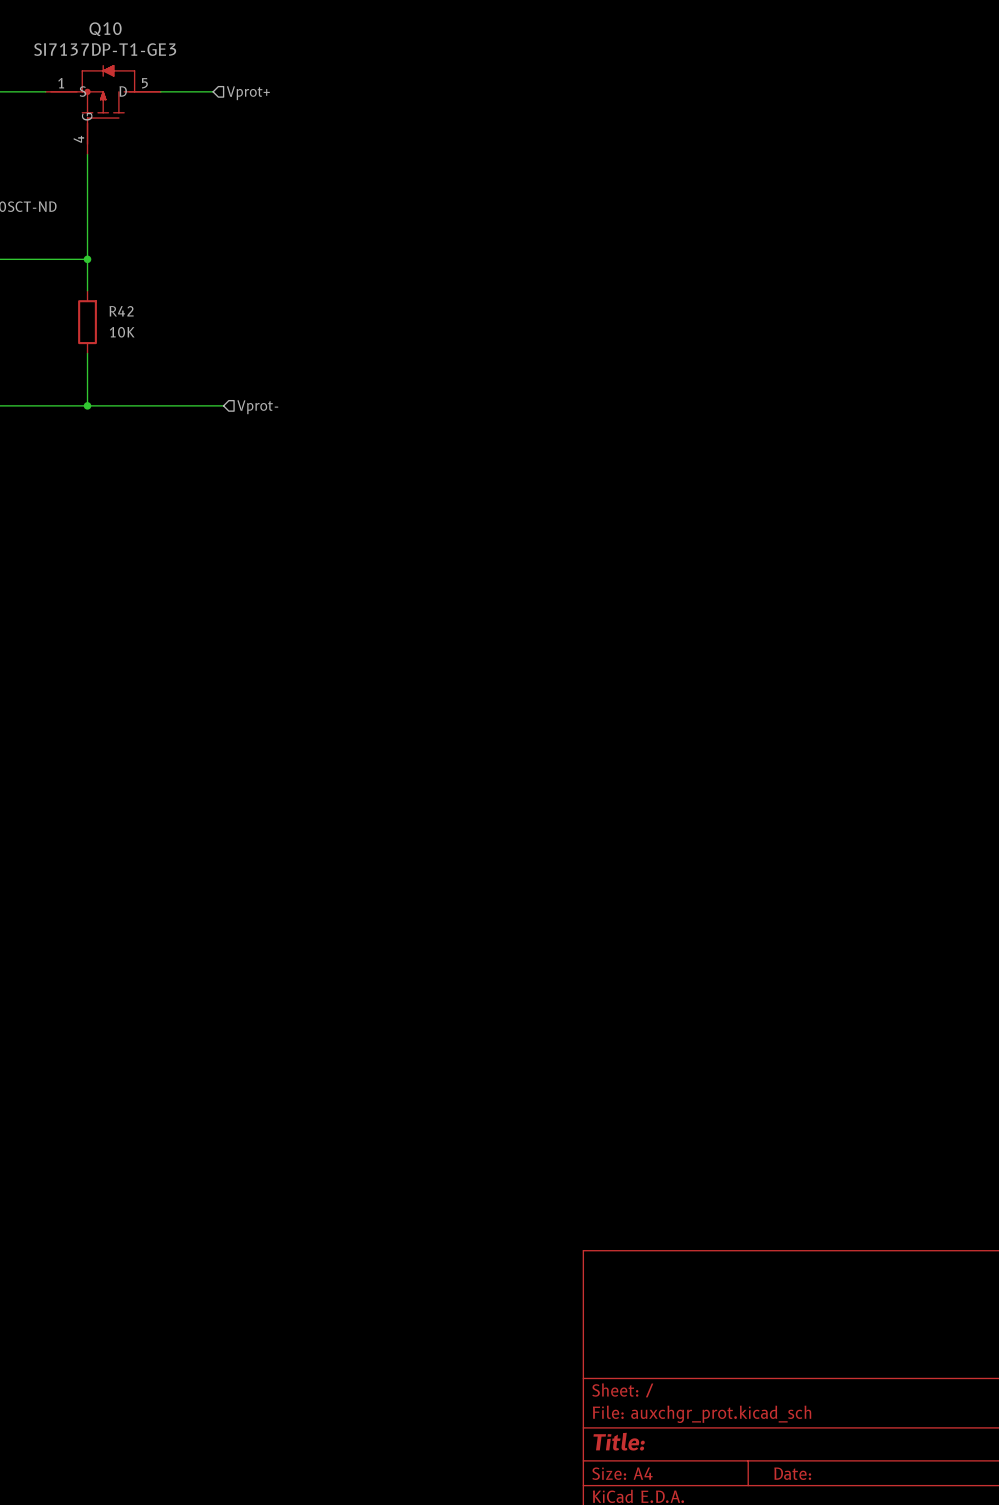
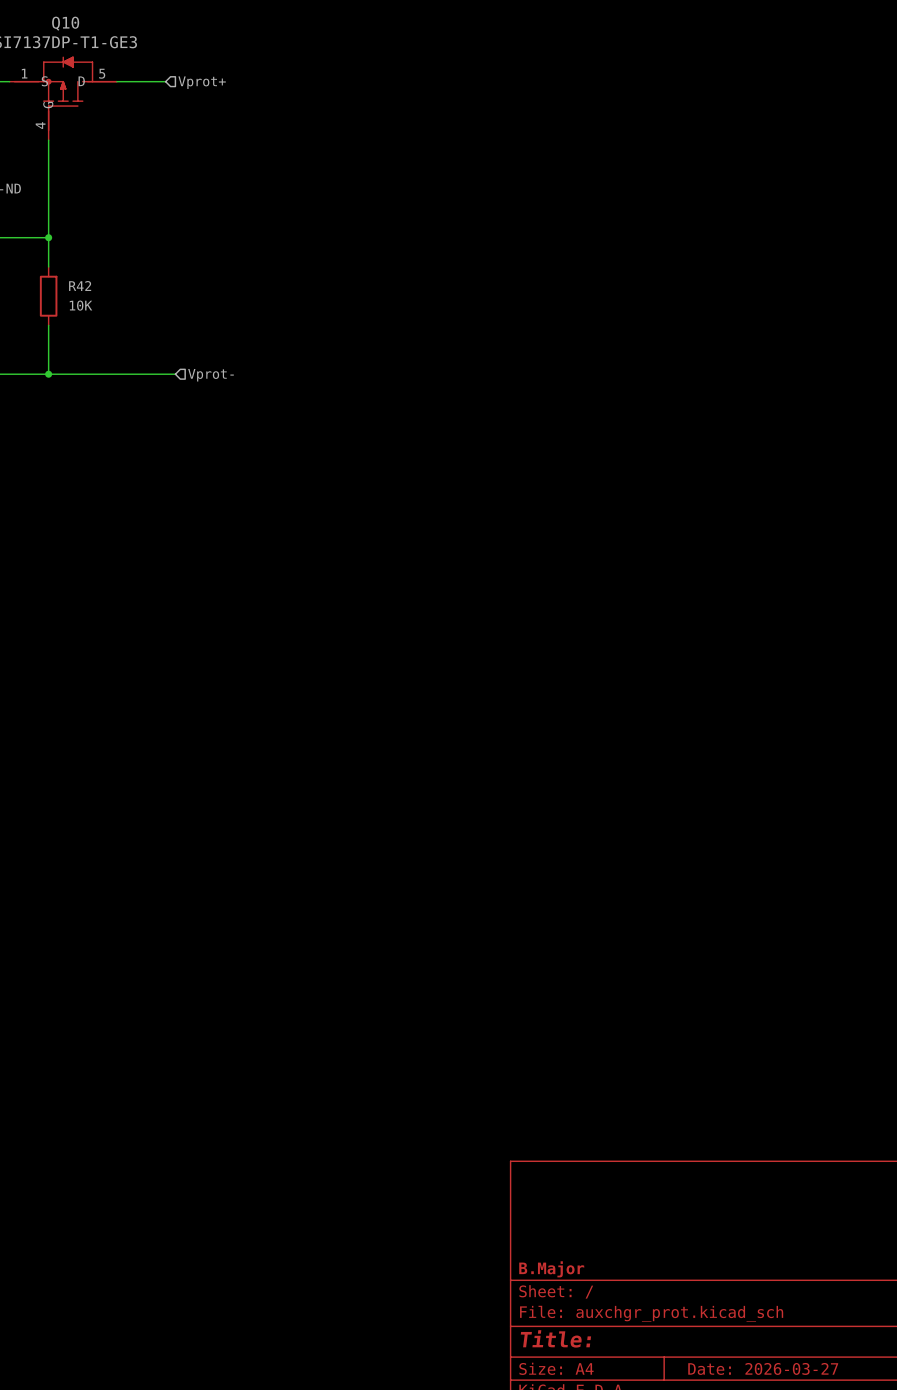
title block: none -> B.Major (551, 1269)
title block: Date: (792, 1473) -> Date: 2026-03-27 (763, 1368)

